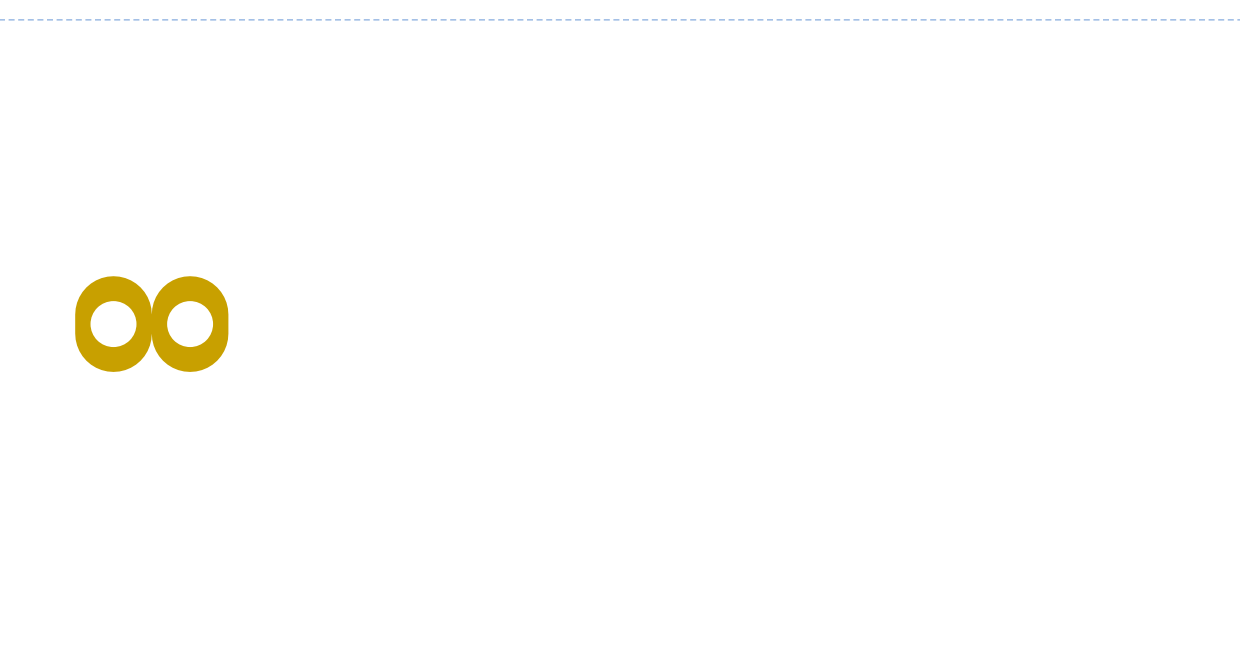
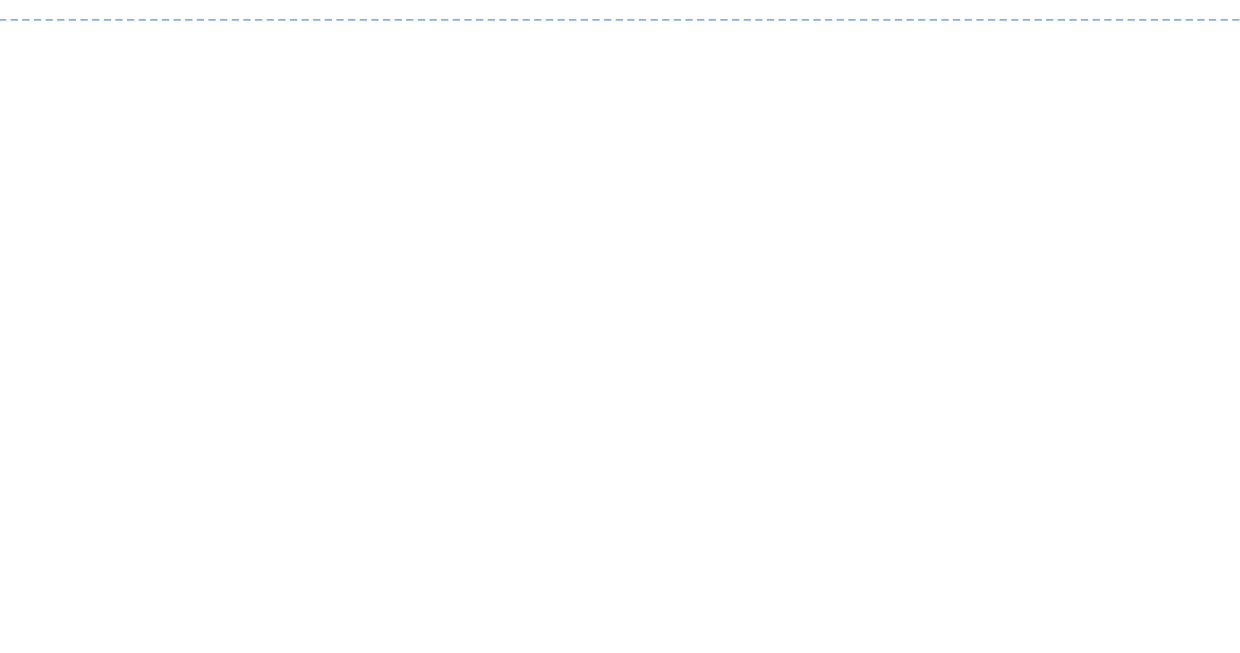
part: (113, 324) -> none
part: (190, 324) -> none

